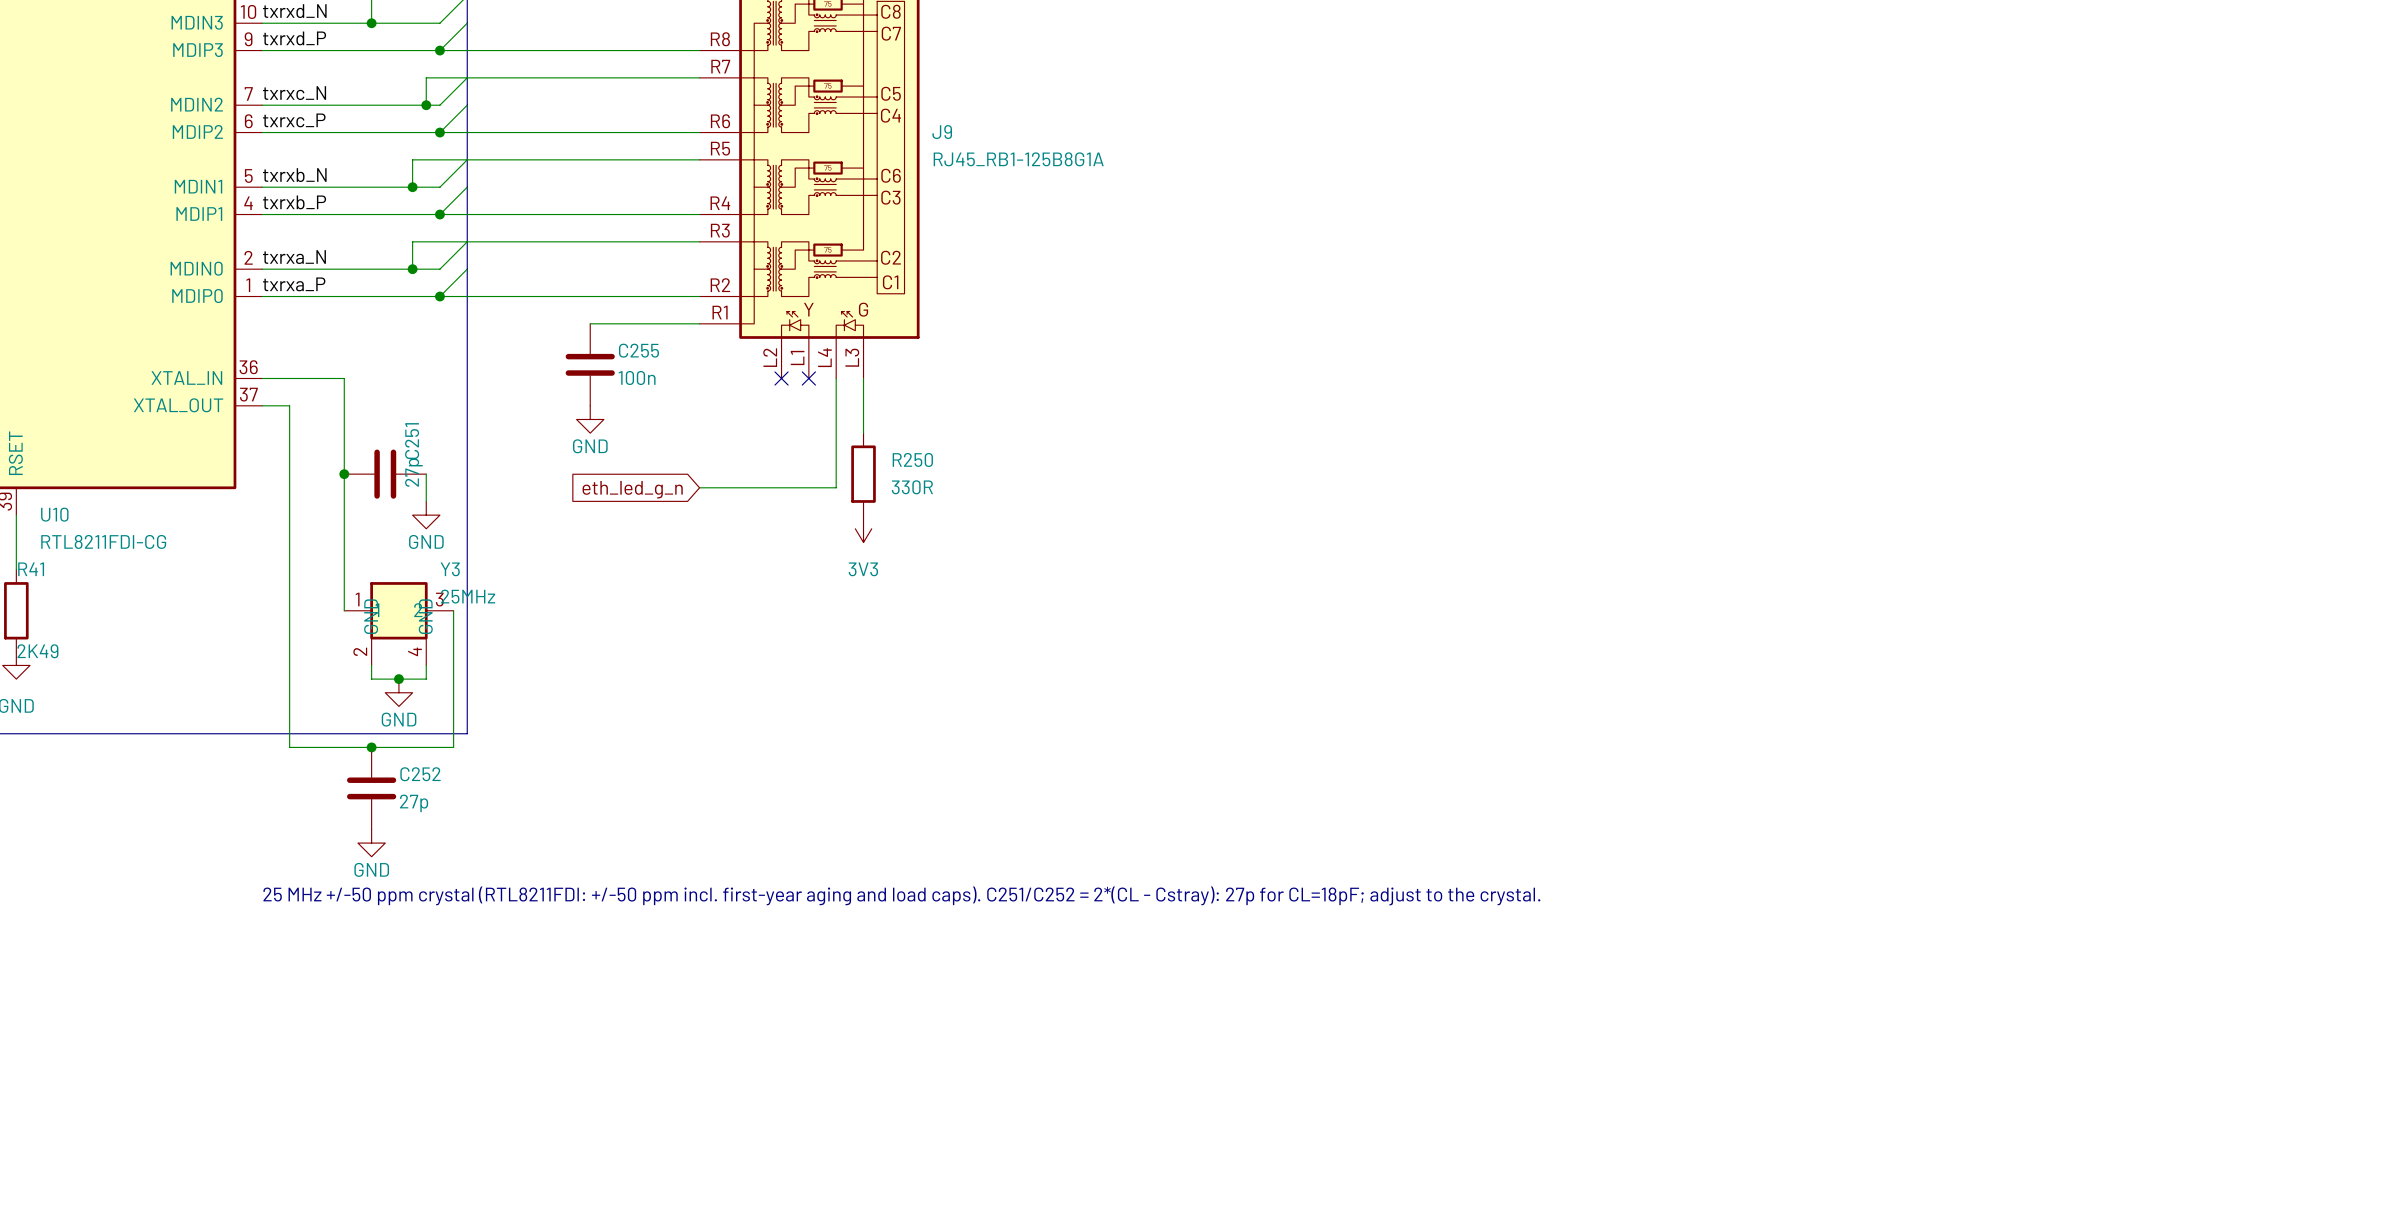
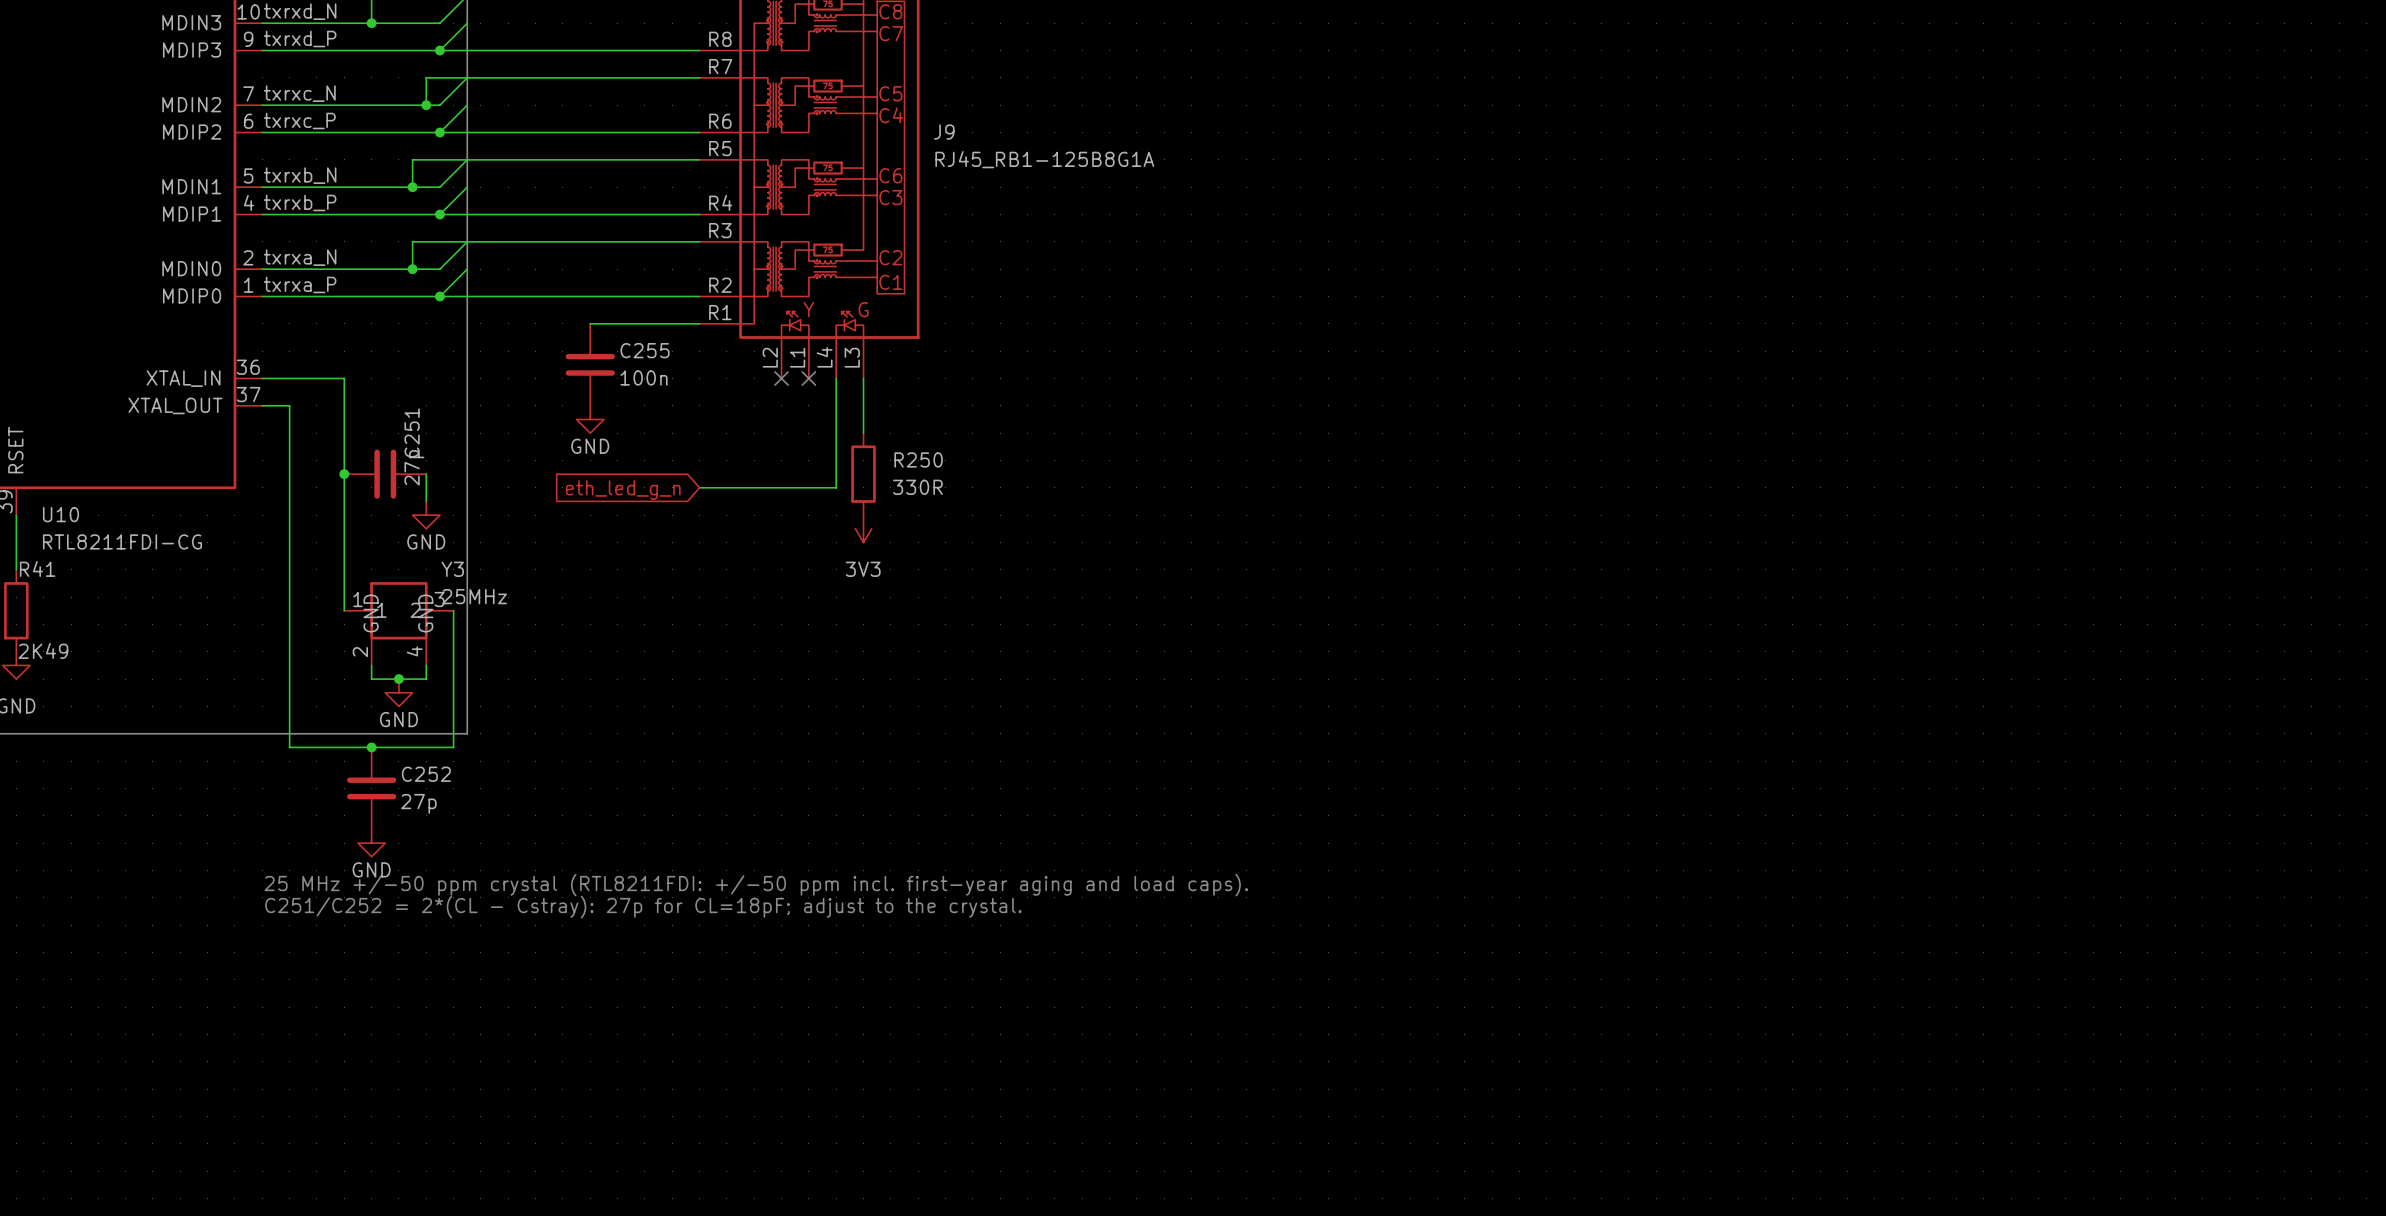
text: none -> 25 MHz +/-50 ppm crystal (RTL8211FDI: +/-50 ppm incl. first-year aging and load caps). (756, 885)
text: 25 MHz +/-50 ppm crystal (RTL8211FDI: +/-50 ppm incl. first-year aging and load caps). C251/C252 = 2*(CL - Cstray): 27p for CL=18pF; adjust to the crystal. (901, 895) -> none
text: none -> C251/C252 = 2*(CL - Cstray): 27p for CL=18pF; adjust to the crystal. (643, 907)

